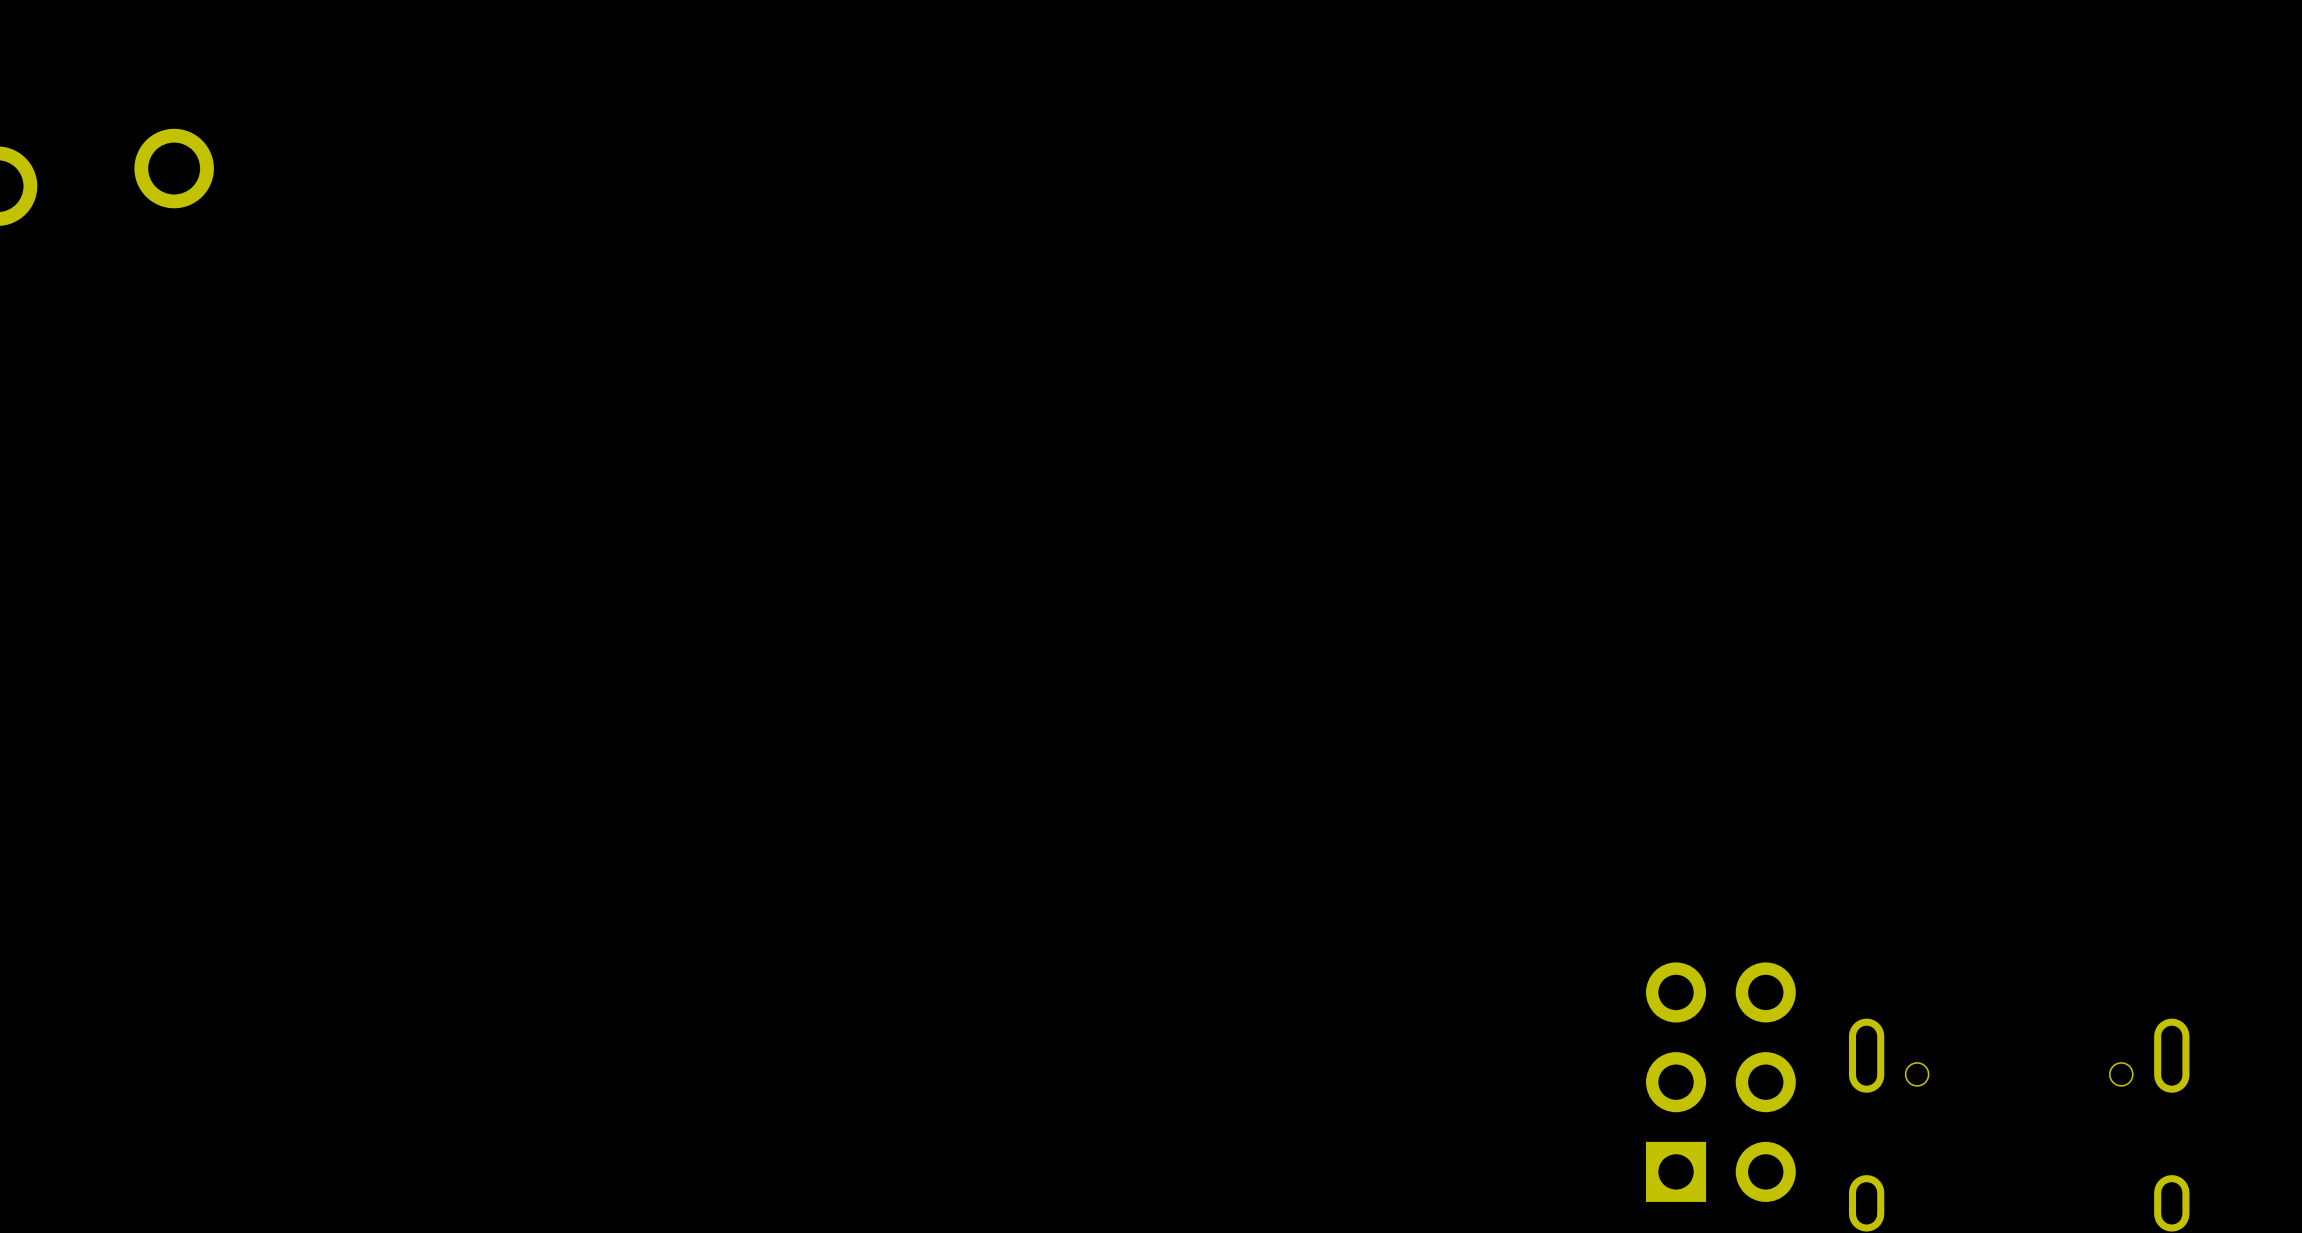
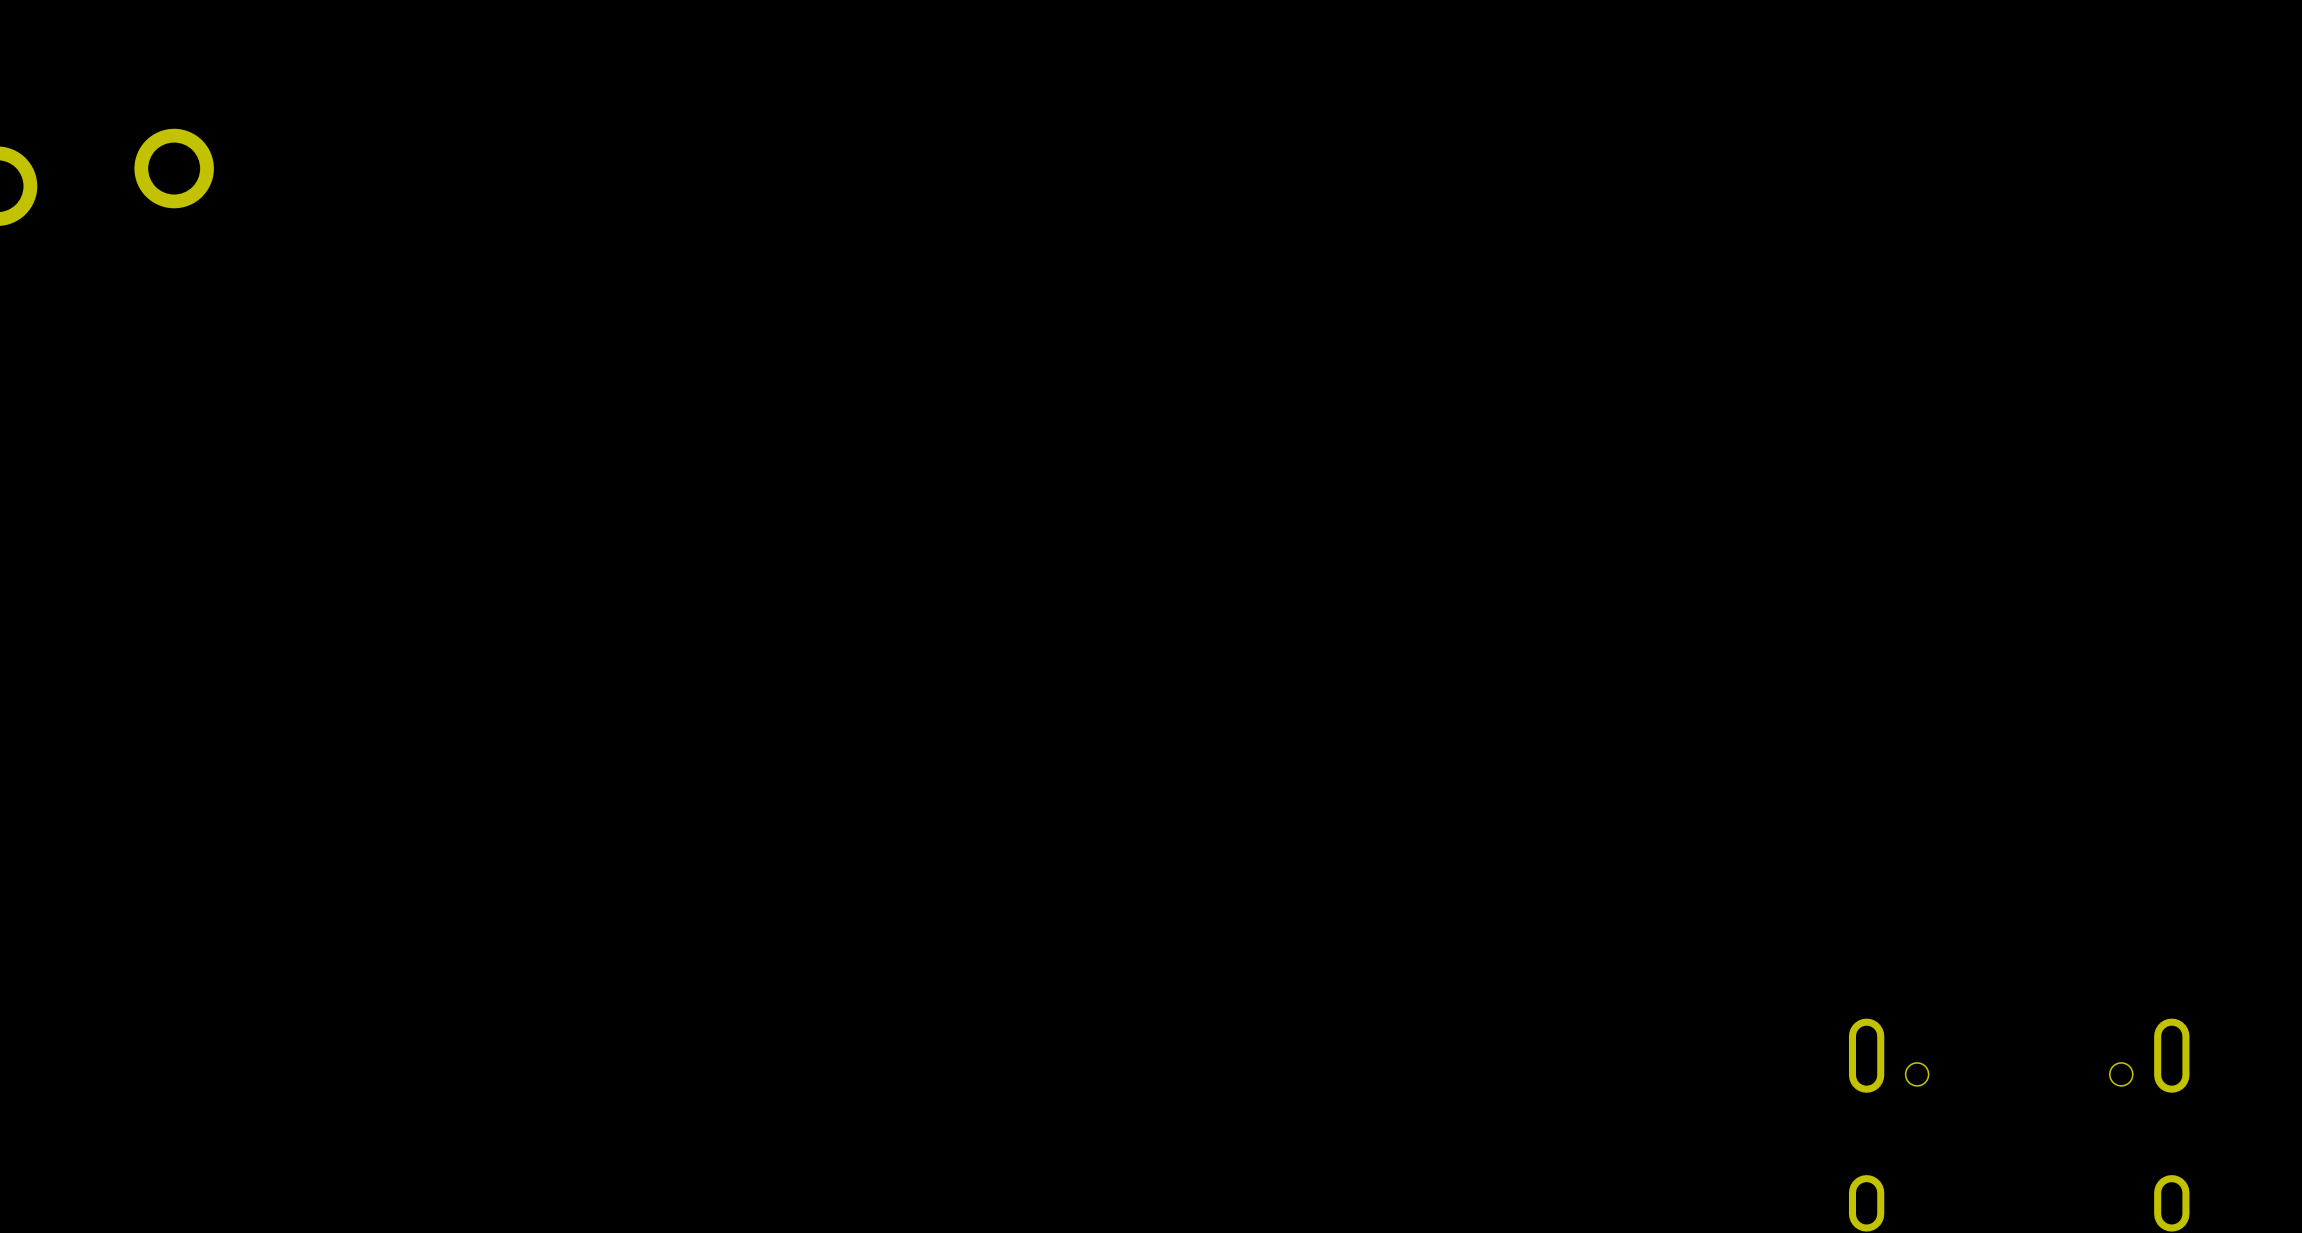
part: (1720, 1082) -> none

